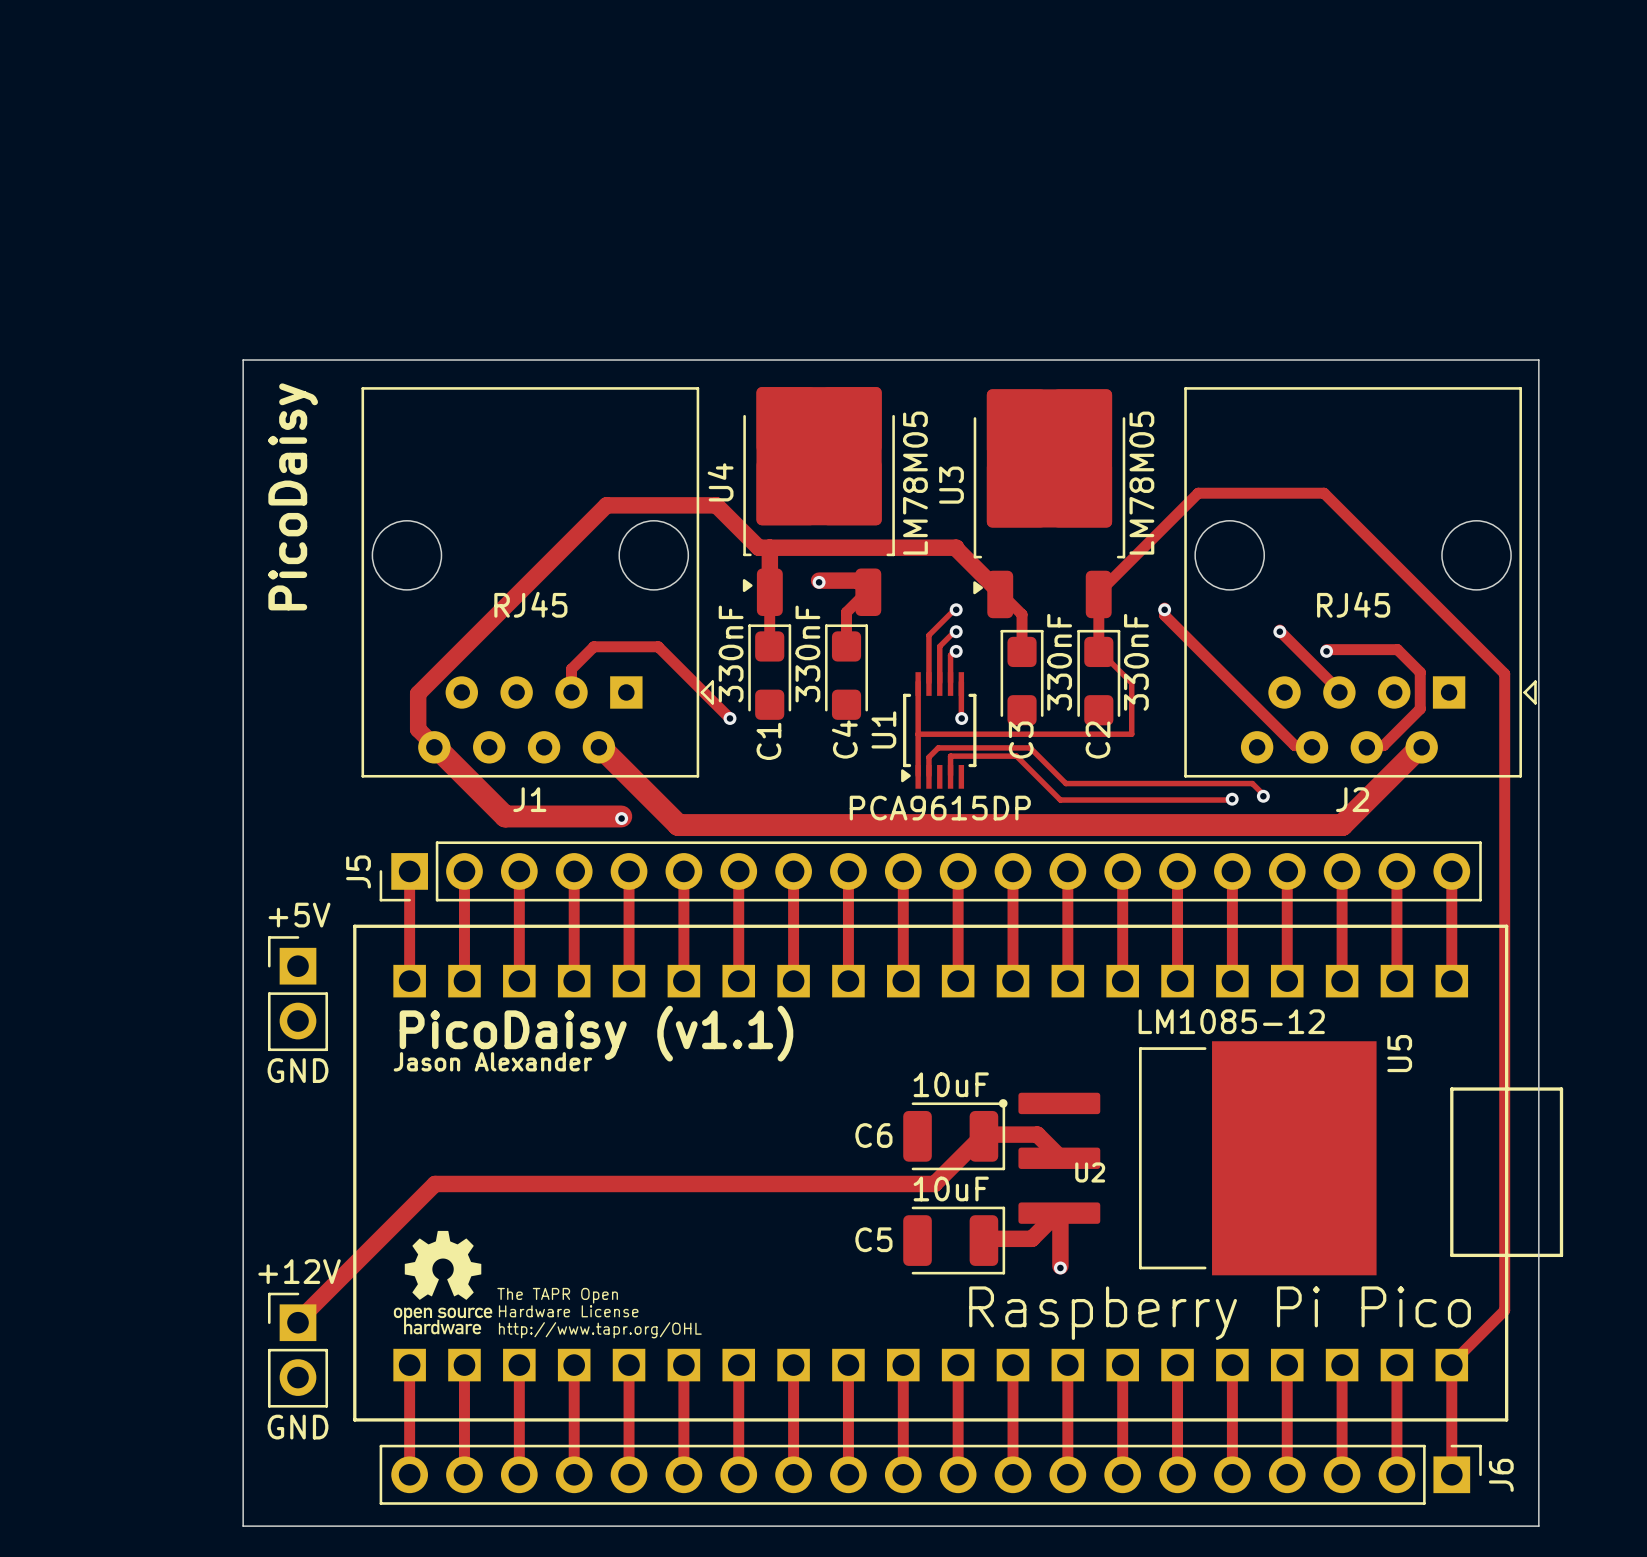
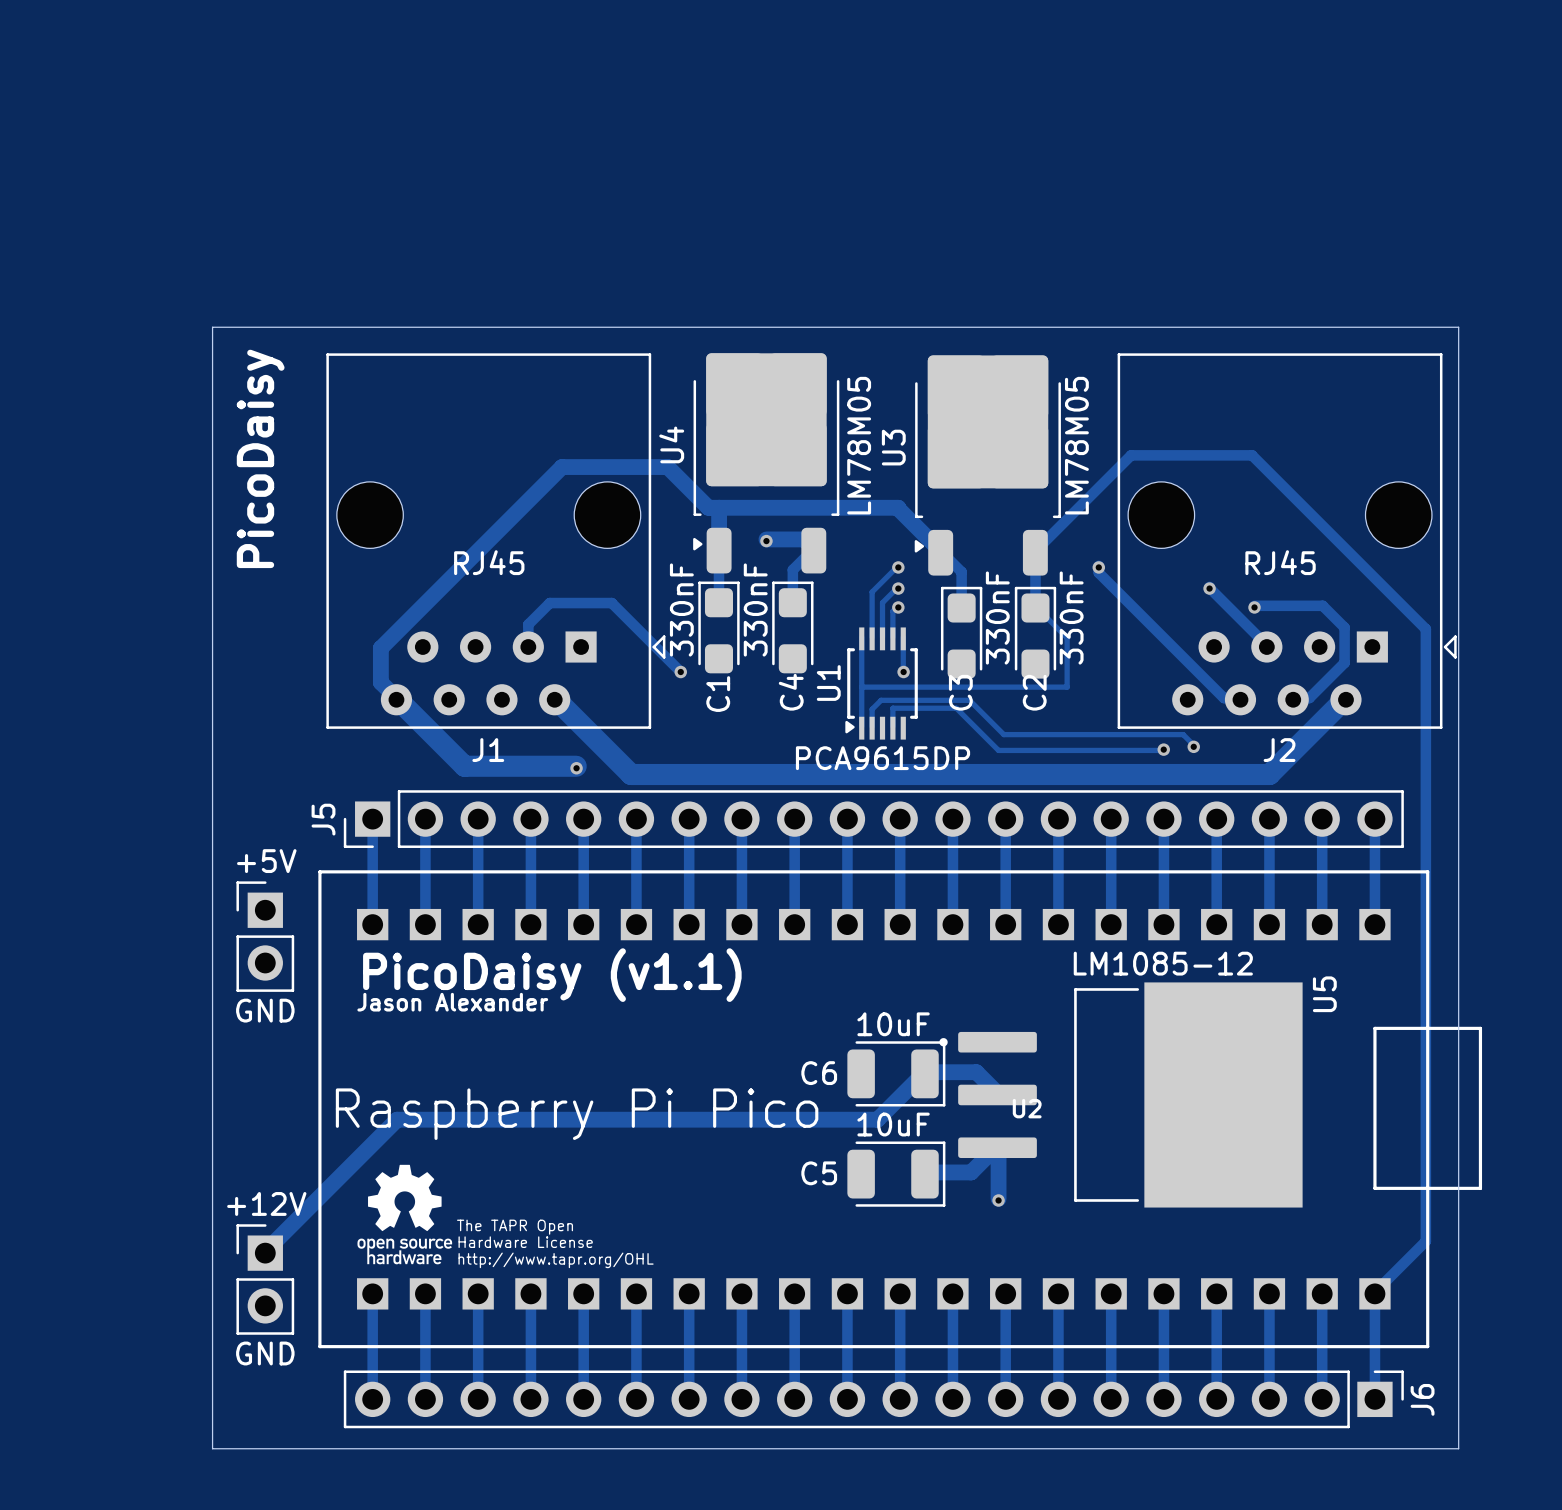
U2 text position: Raspberry Pi Pico (1220, 1313) -> Raspberry Pi Pico (577, 1114)

